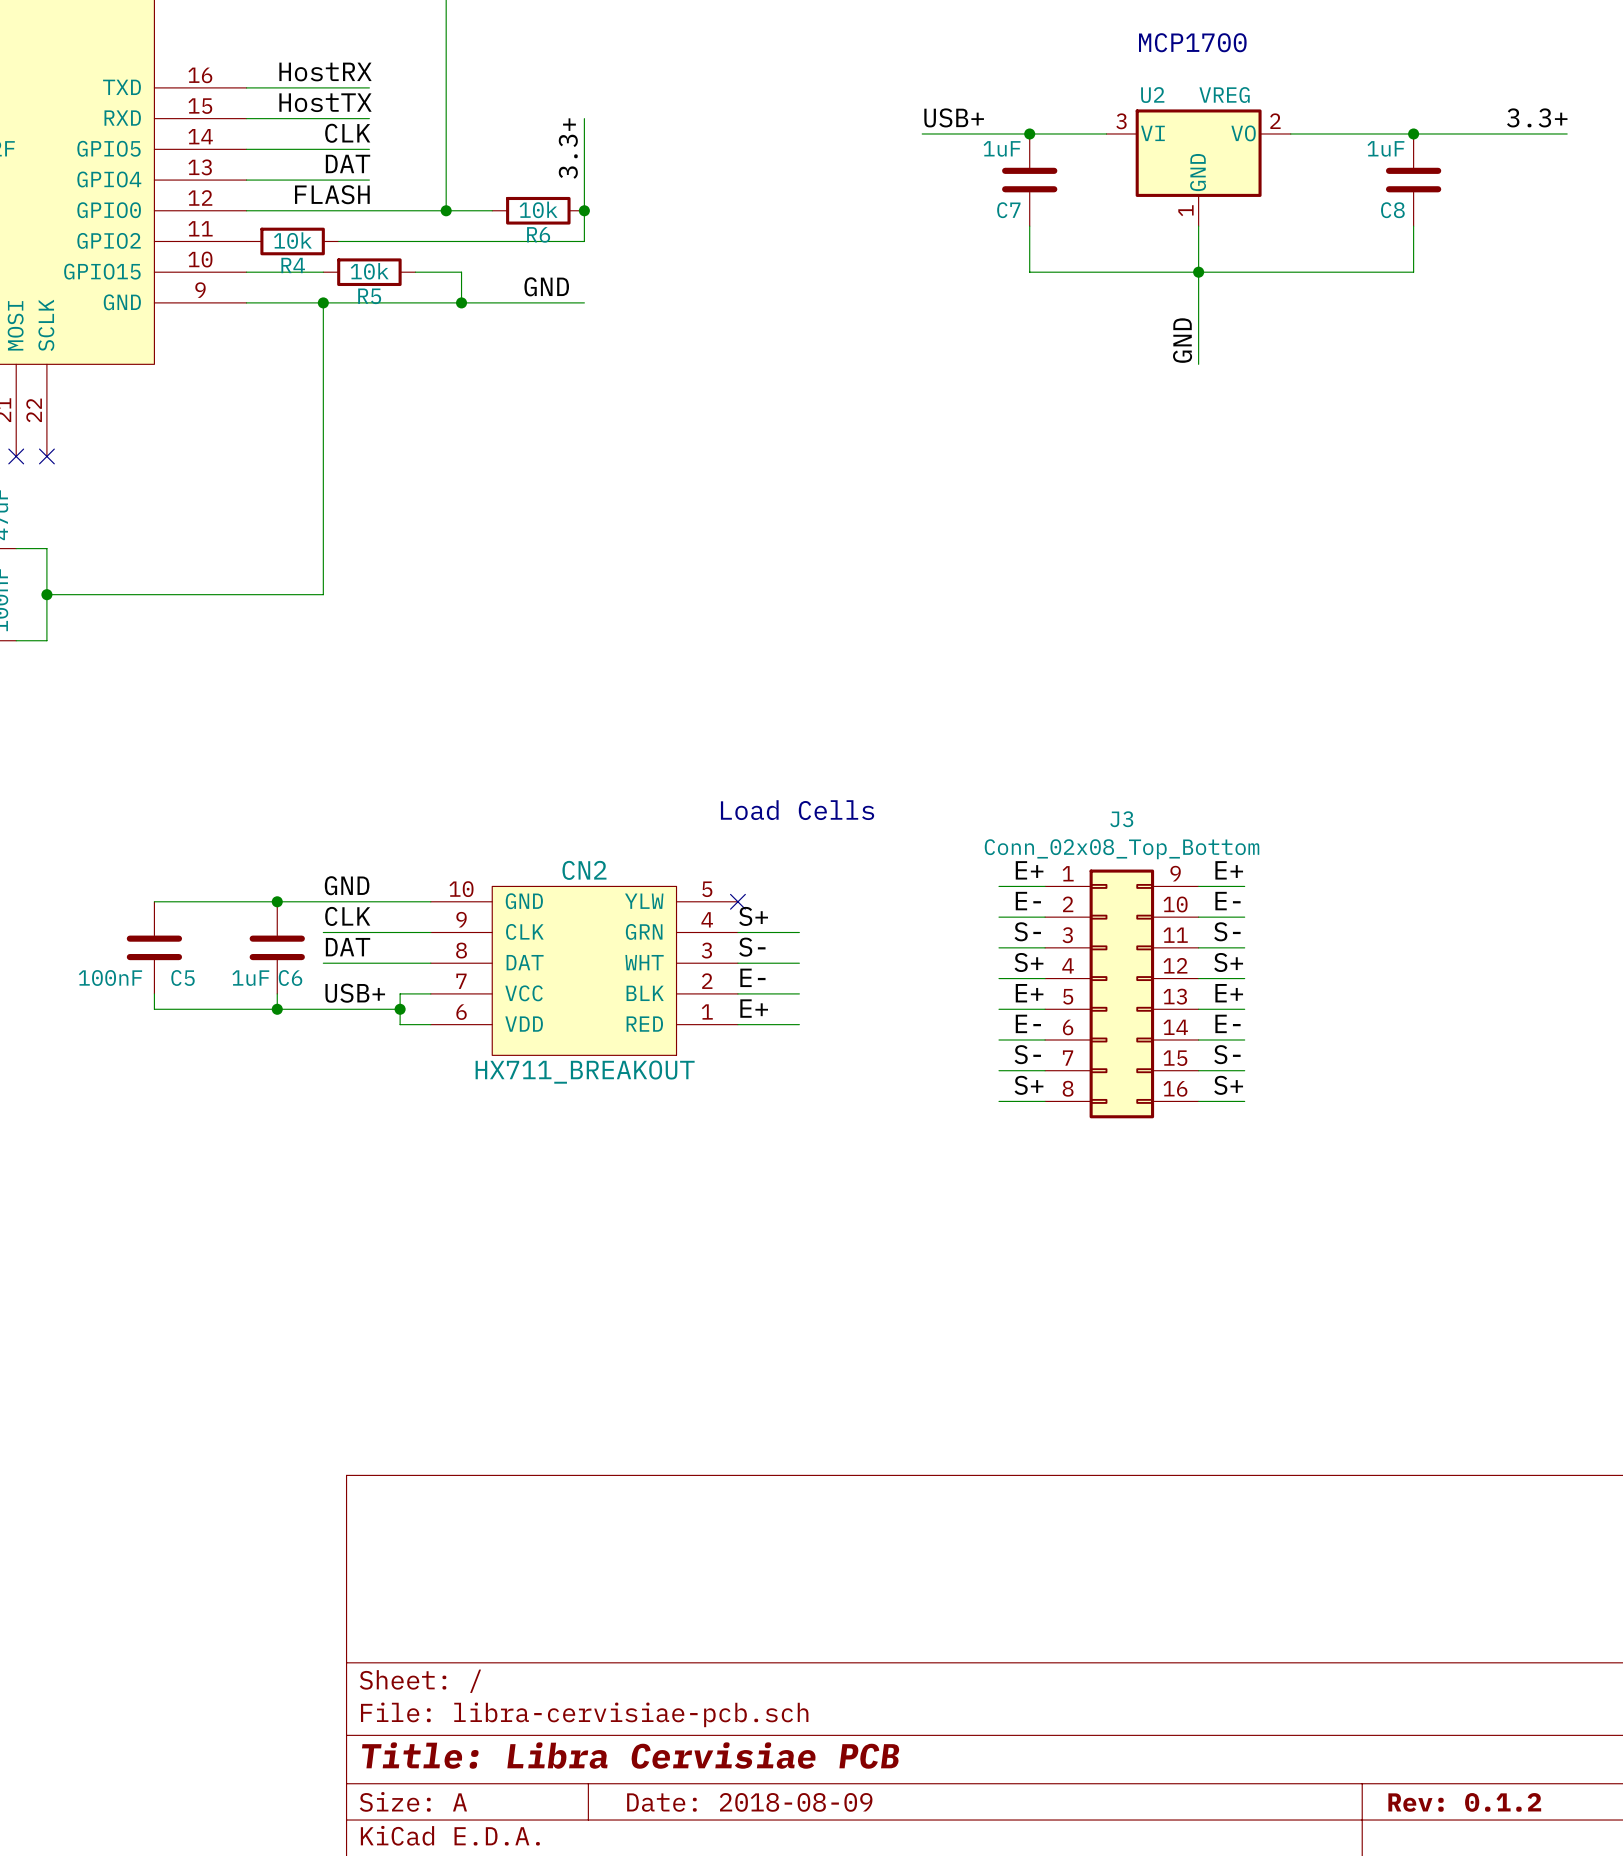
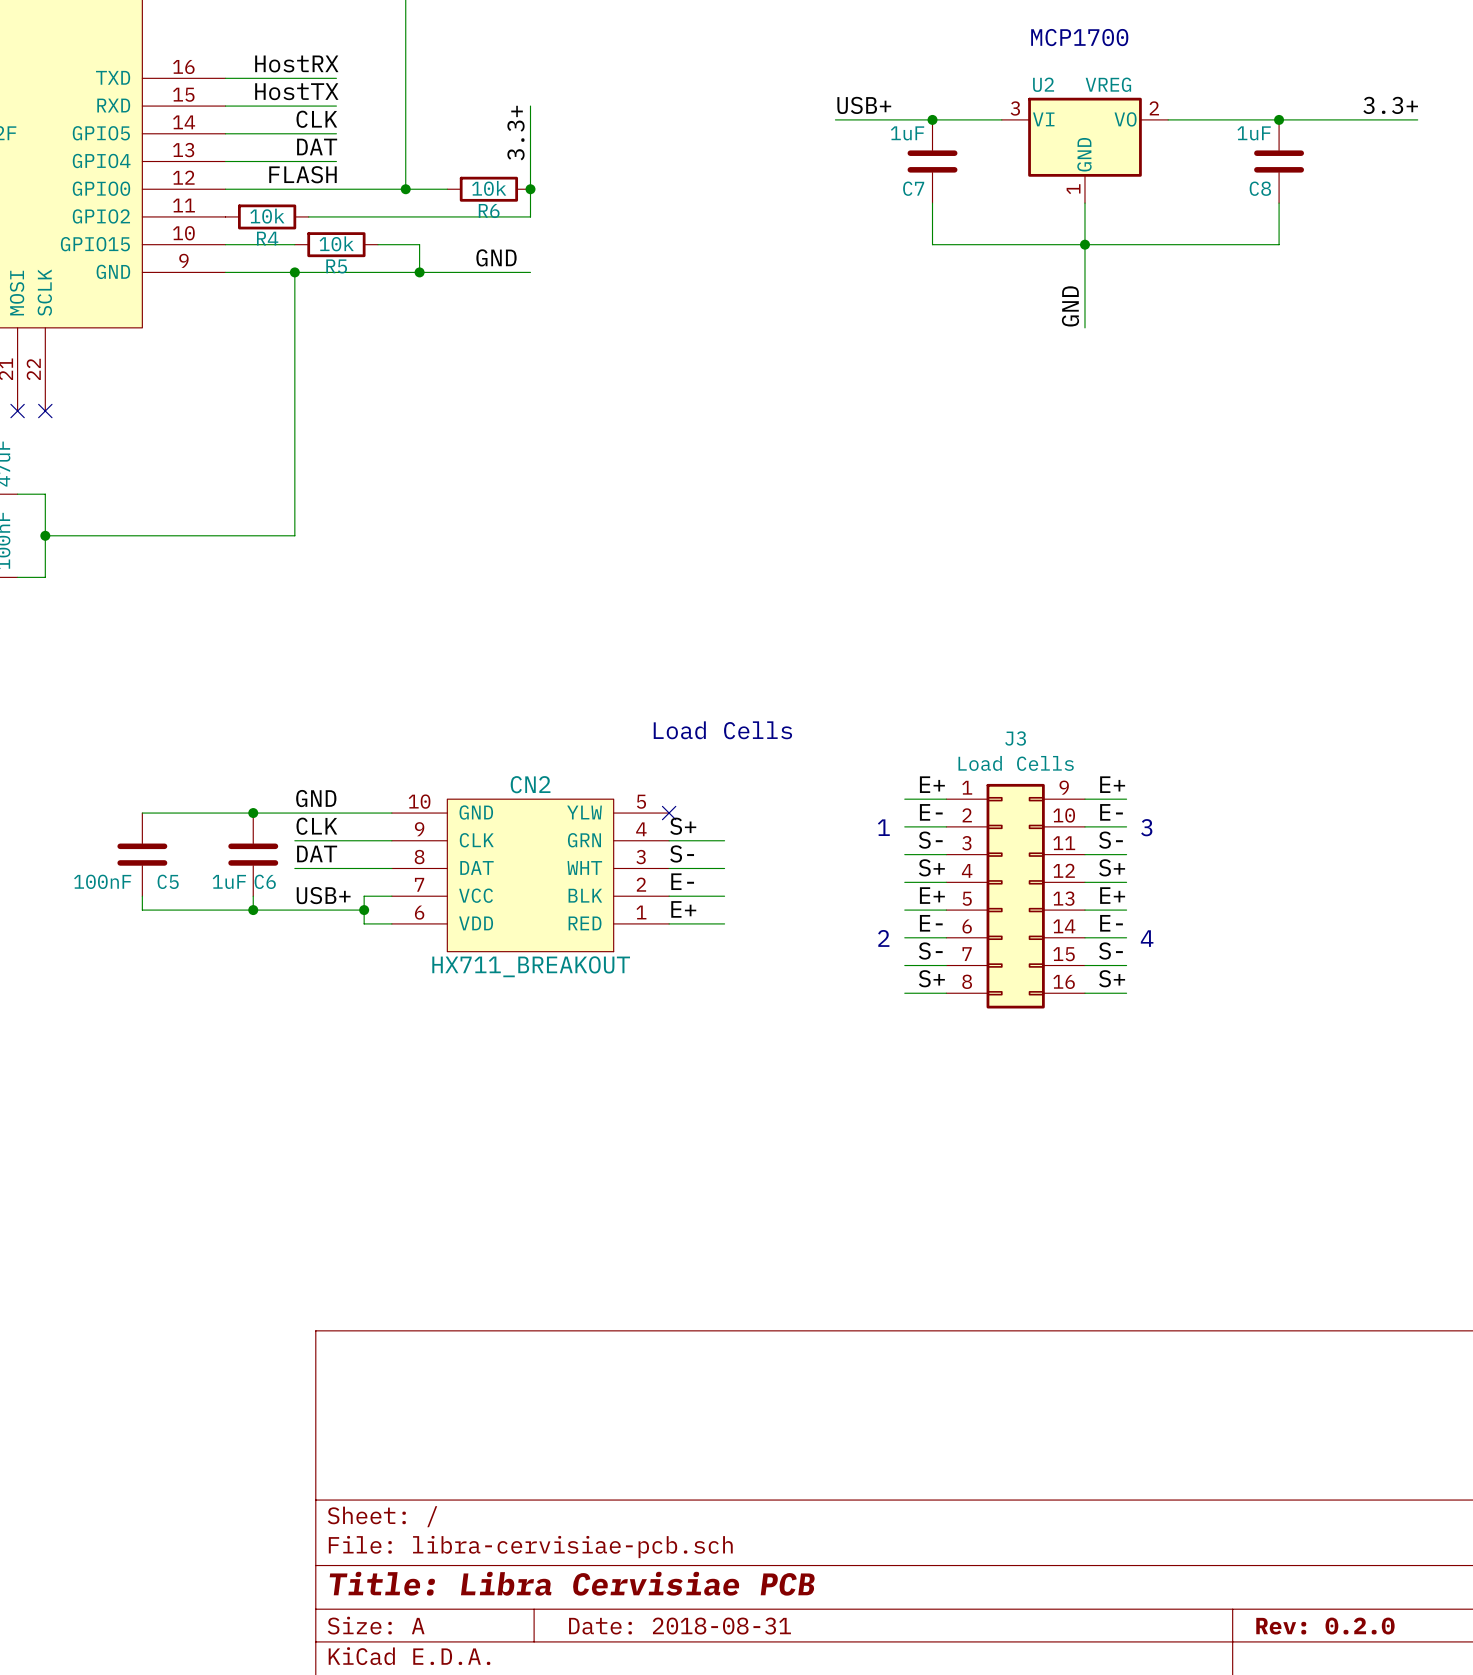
J3 value: Conn_02x08_Top_Bottom (1122, 849) -> Load Cells (1016, 763)
text: none -> 1 (883, 827)
text: none -> 3 (1146, 827)
text: none -> 2 (883, 938)
text: none -> 4 (1147, 938)
title block: Date: 2018-08-09 (749, 1802) -> Date: 2018-08-31 (680, 1626)
title block: Rev: 0.1.2 (1464, 1802) -> Rev: 0.2.0 (1325, 1626)

